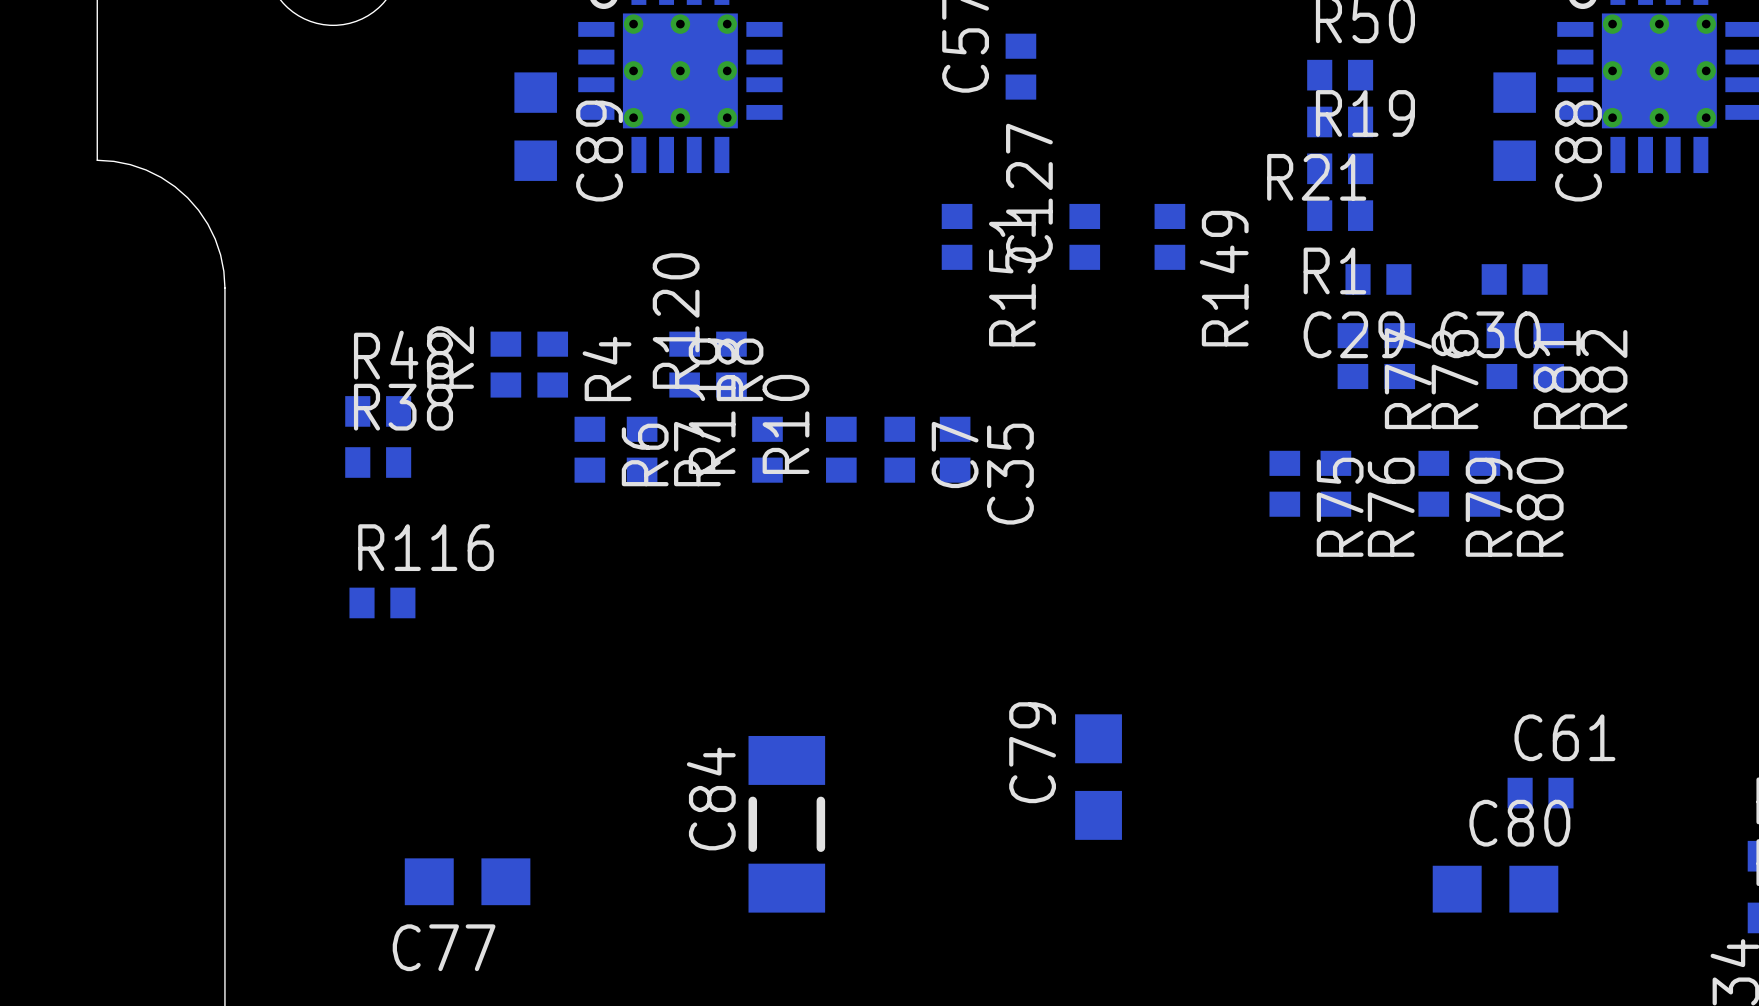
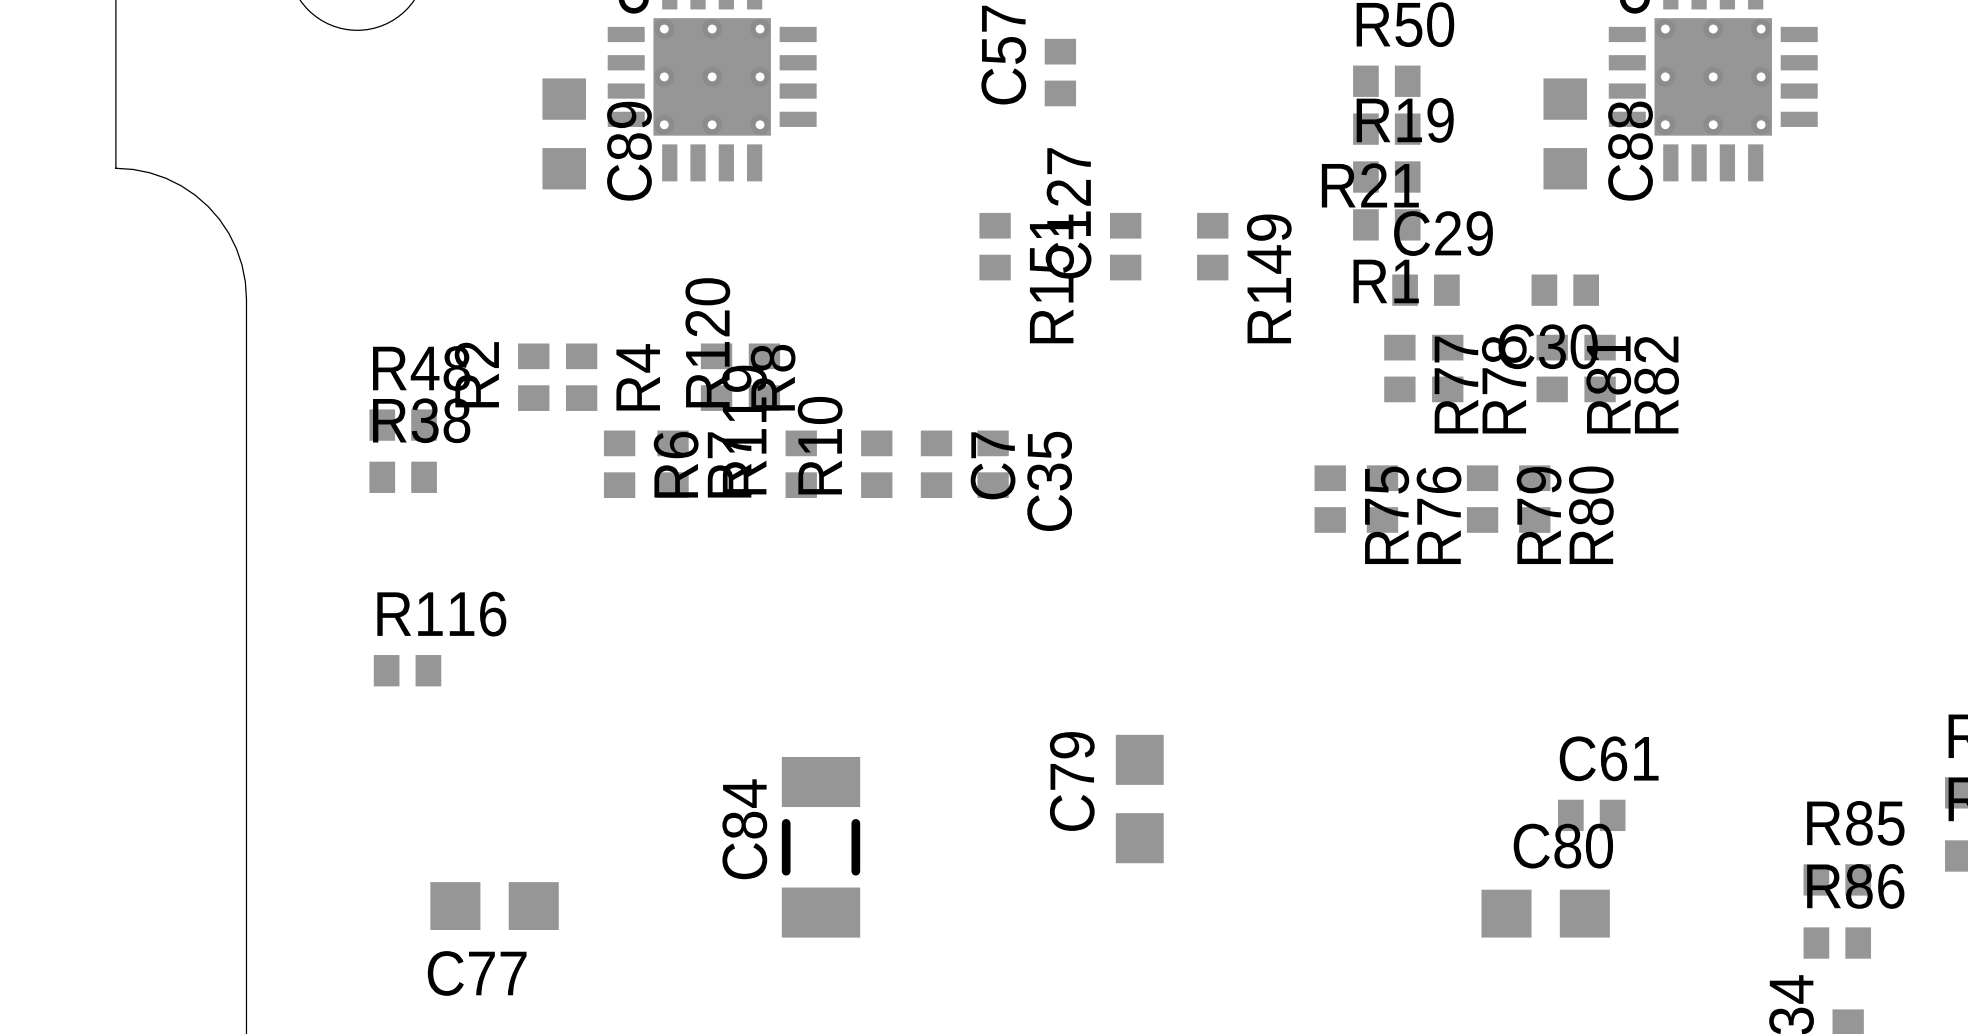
C29 name position: C29 (1354, 334) -> C29 (1443, 233)
R116 position: (382, 602) -> (407, 670)

